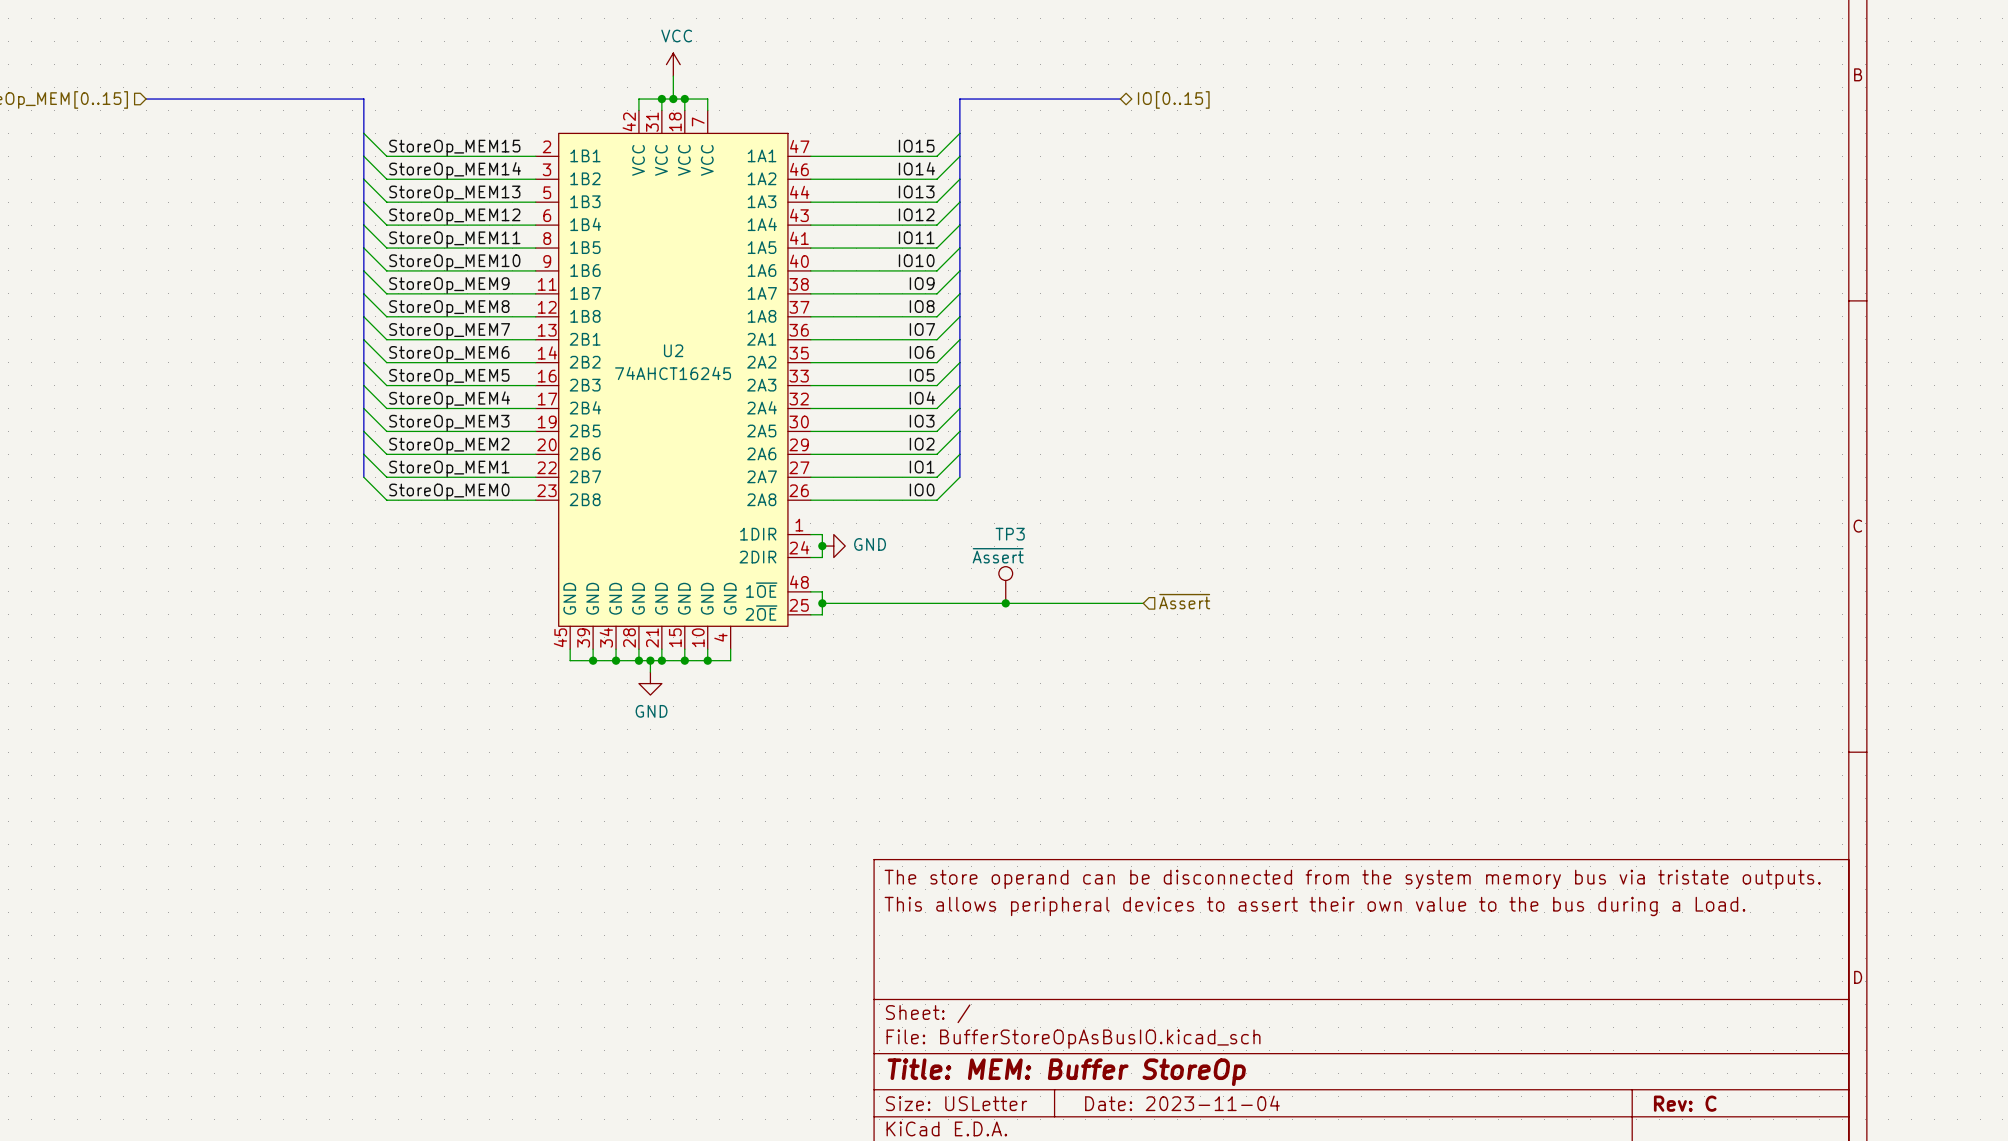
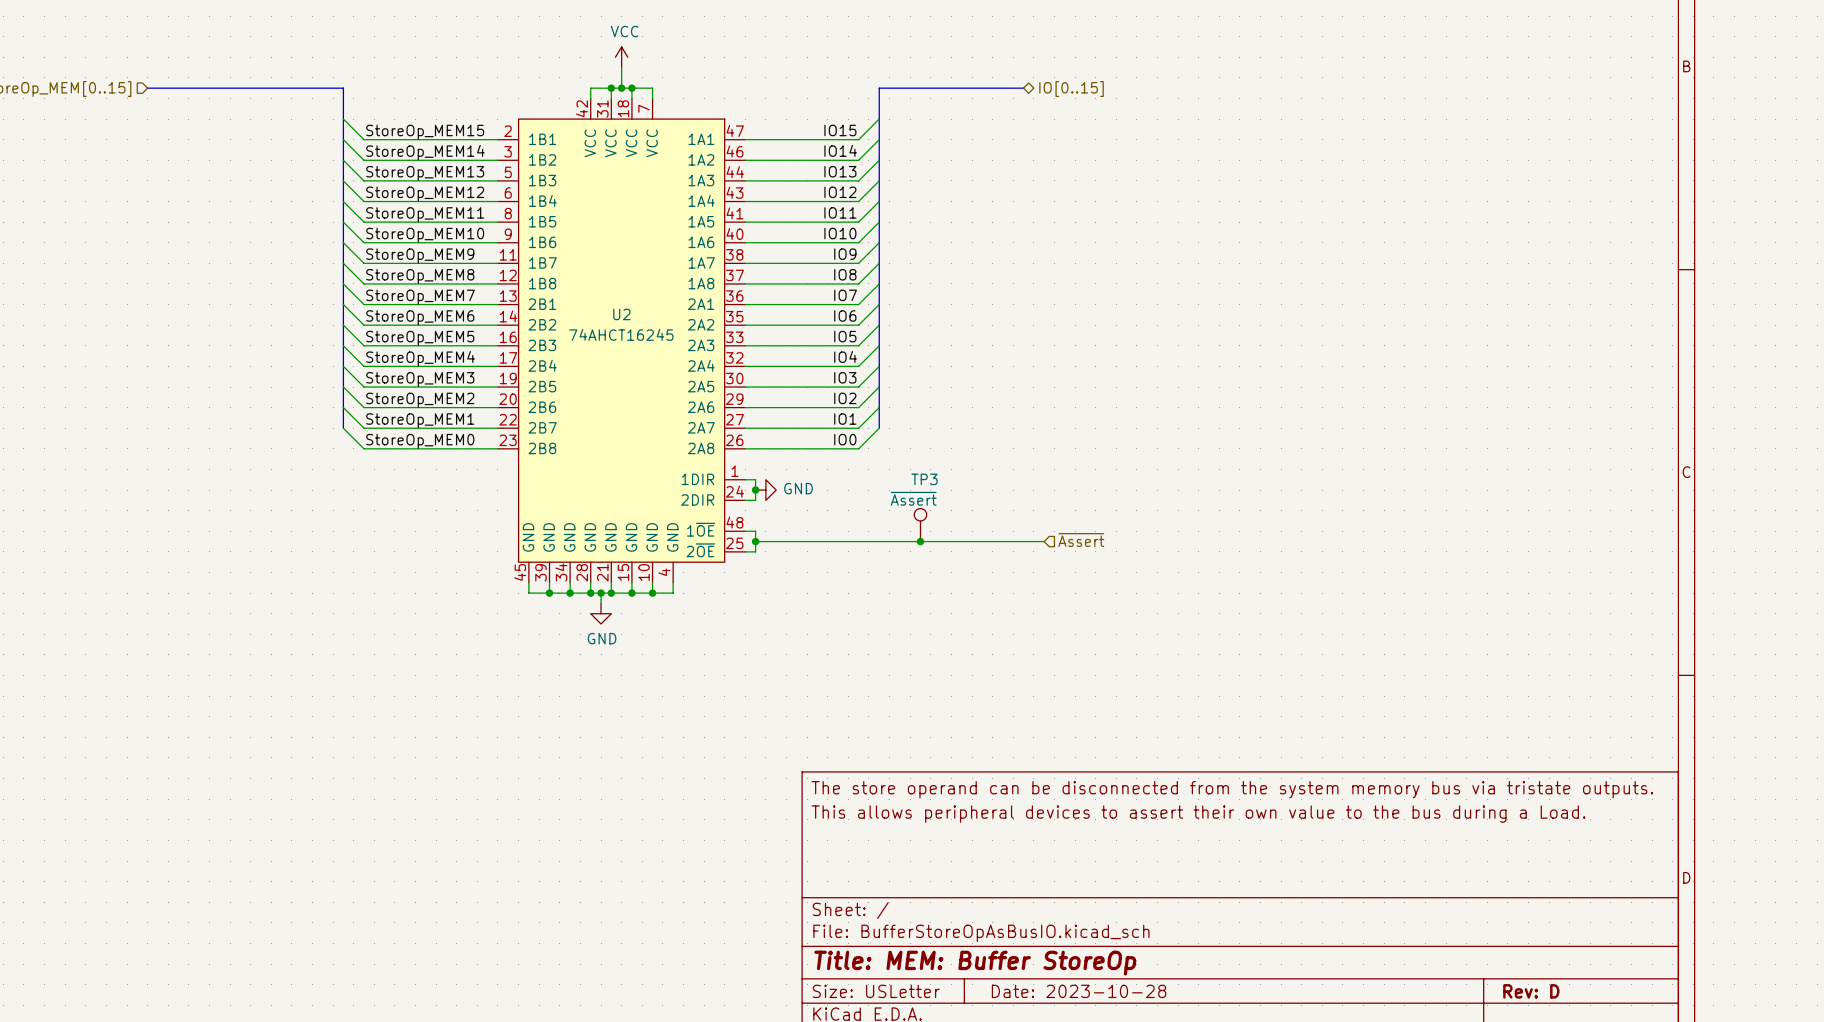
title block: Date: 2023-11-04 (1182, 1103) -> Date: 2023-10-28 (1079, 991)
title block: Rev: C (1685, 1103) -> Rev: D (1531, 991)

